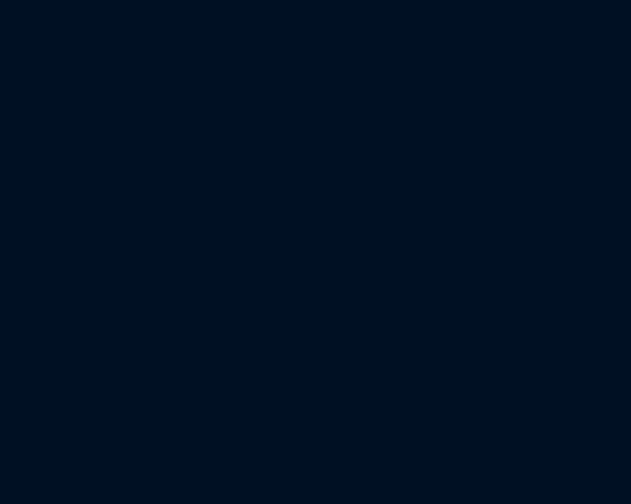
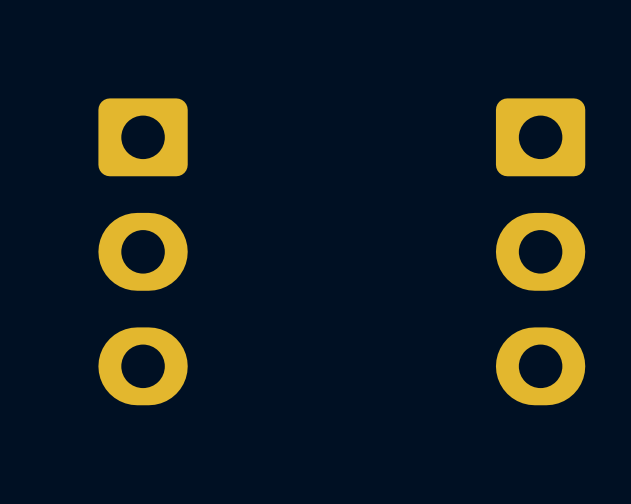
part: none -> (143, 251)
part: none -> (540, 251)

